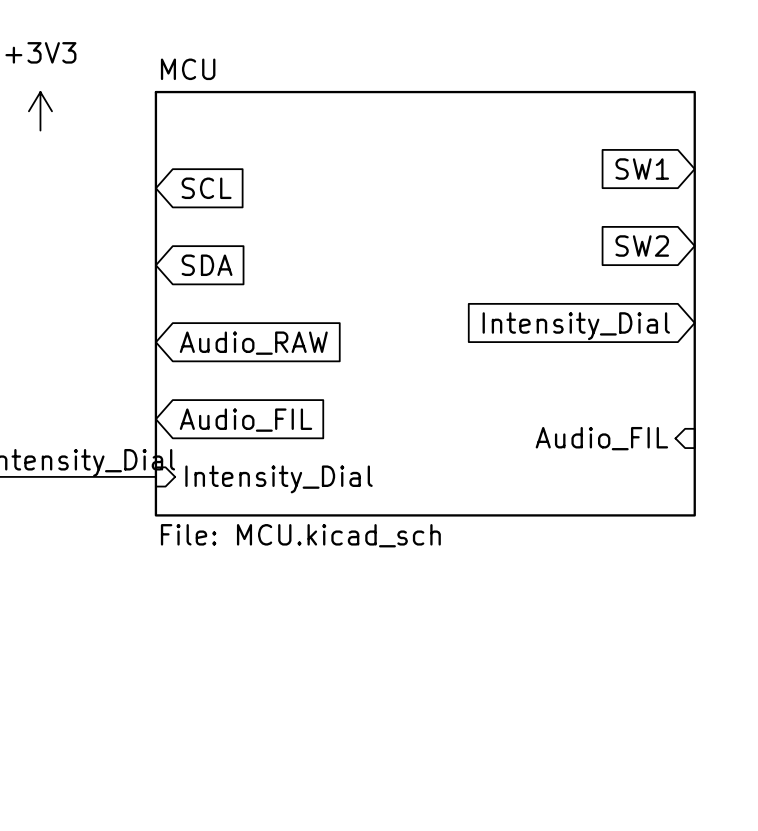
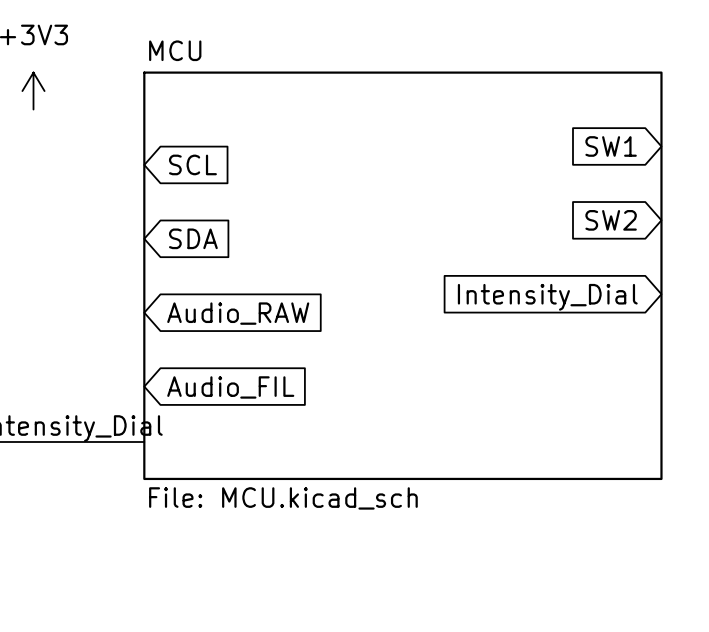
sheet pin: Audio_FIL (601, 438) -> none
sheet pin: Intensity_Dial (279, 479) -> none

